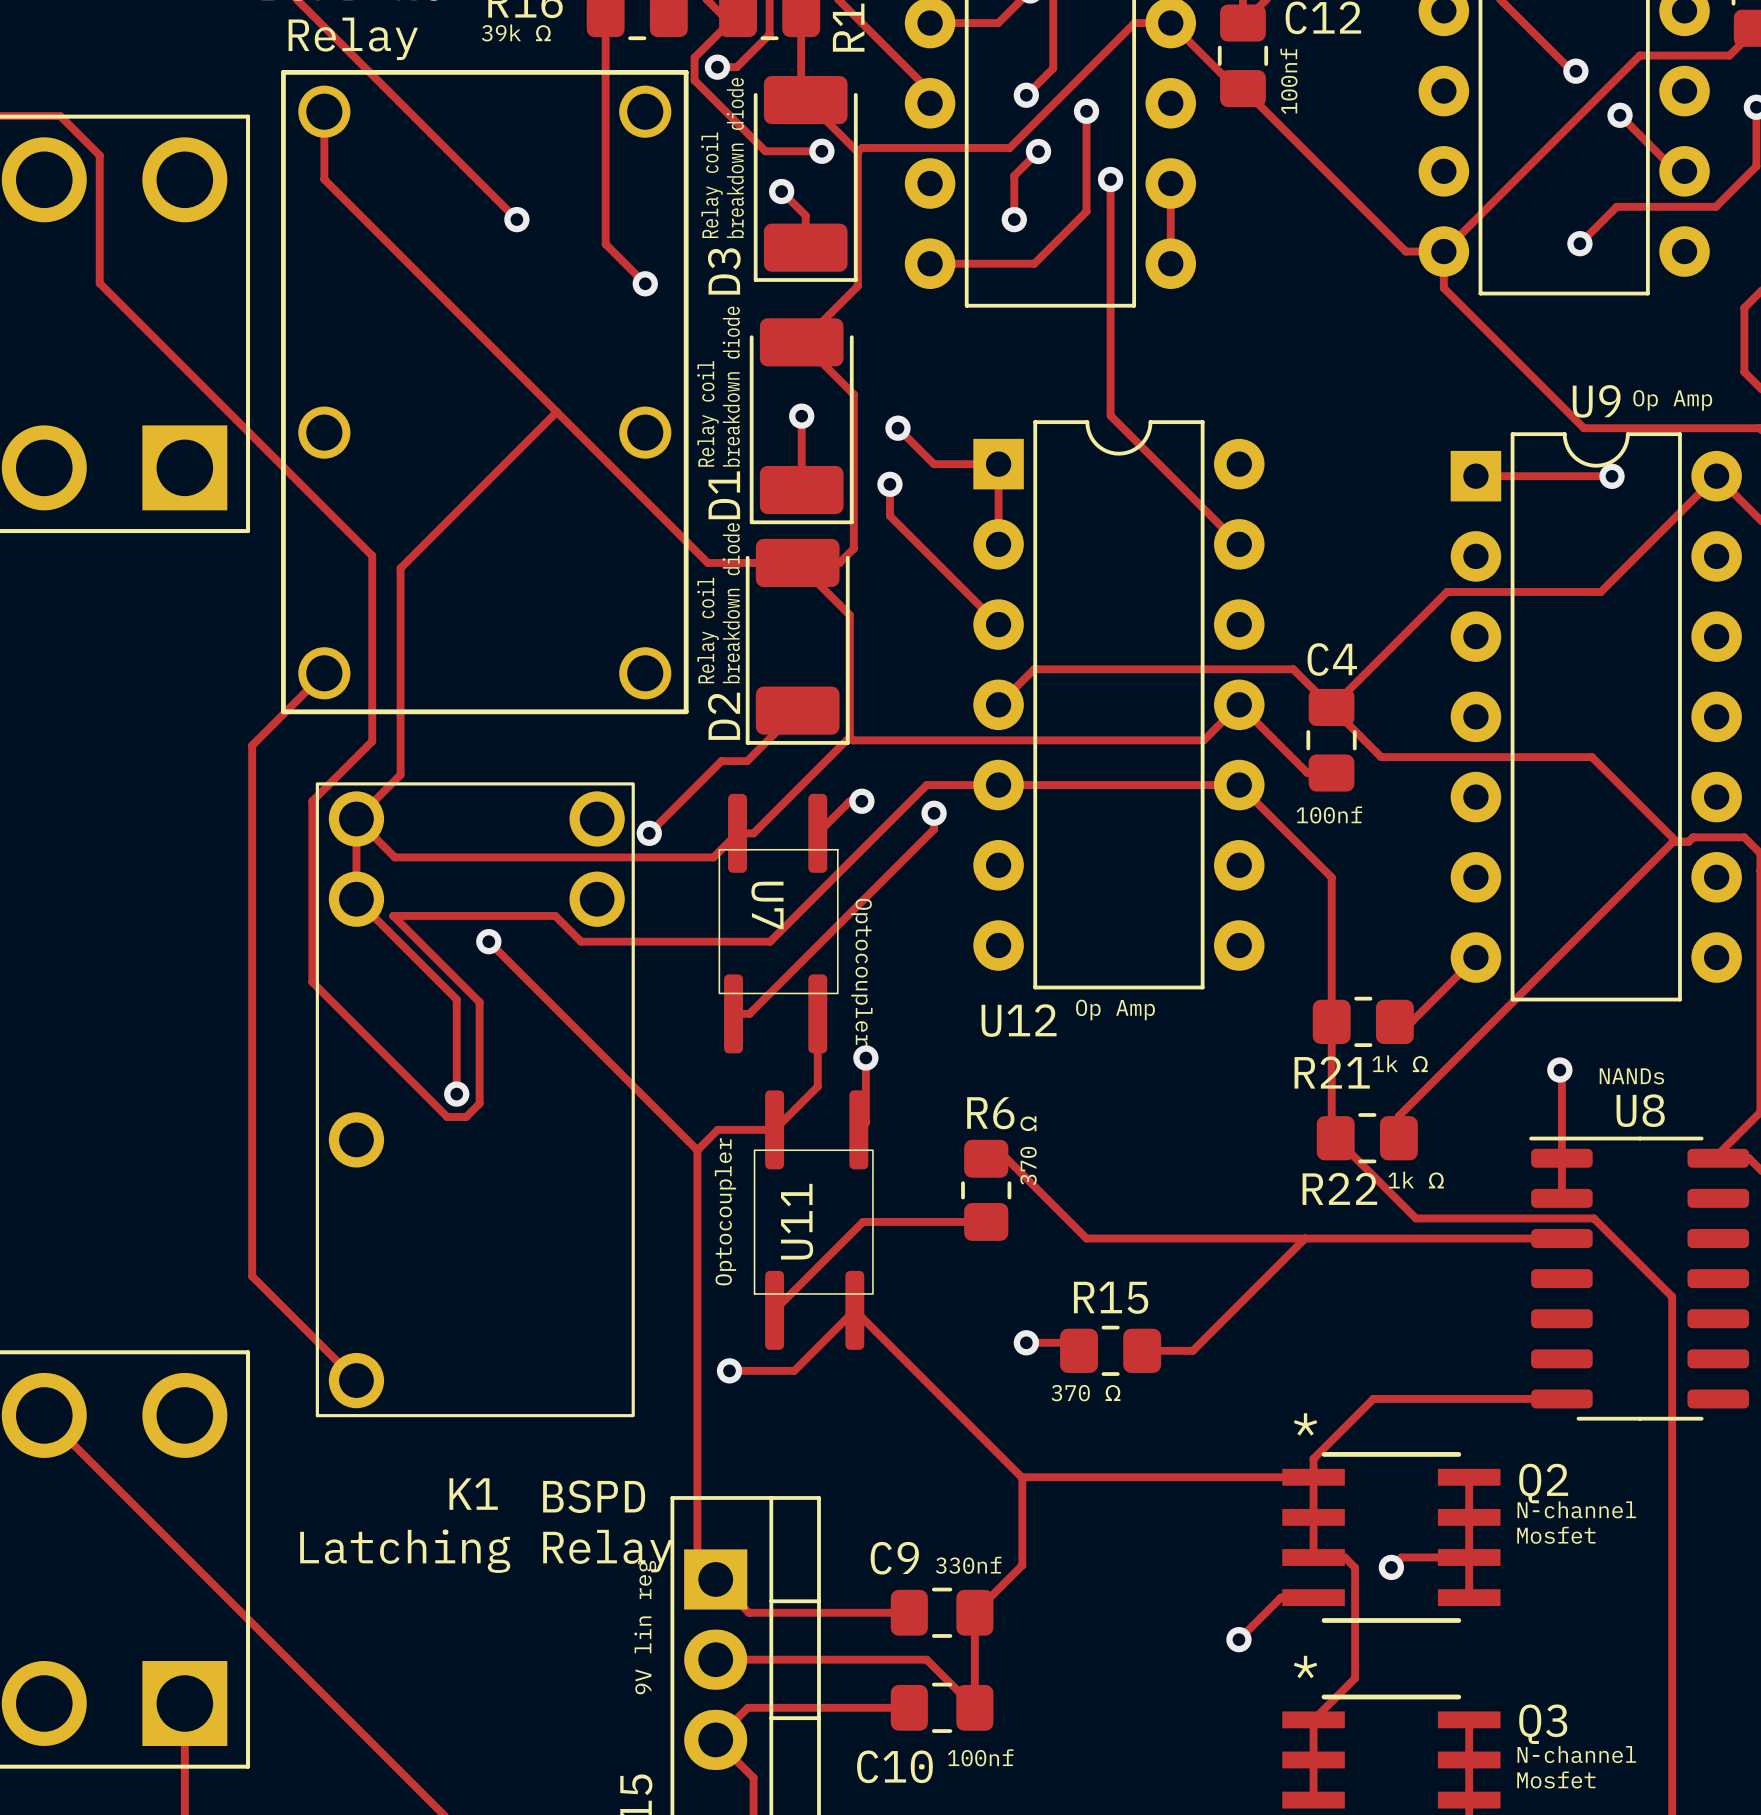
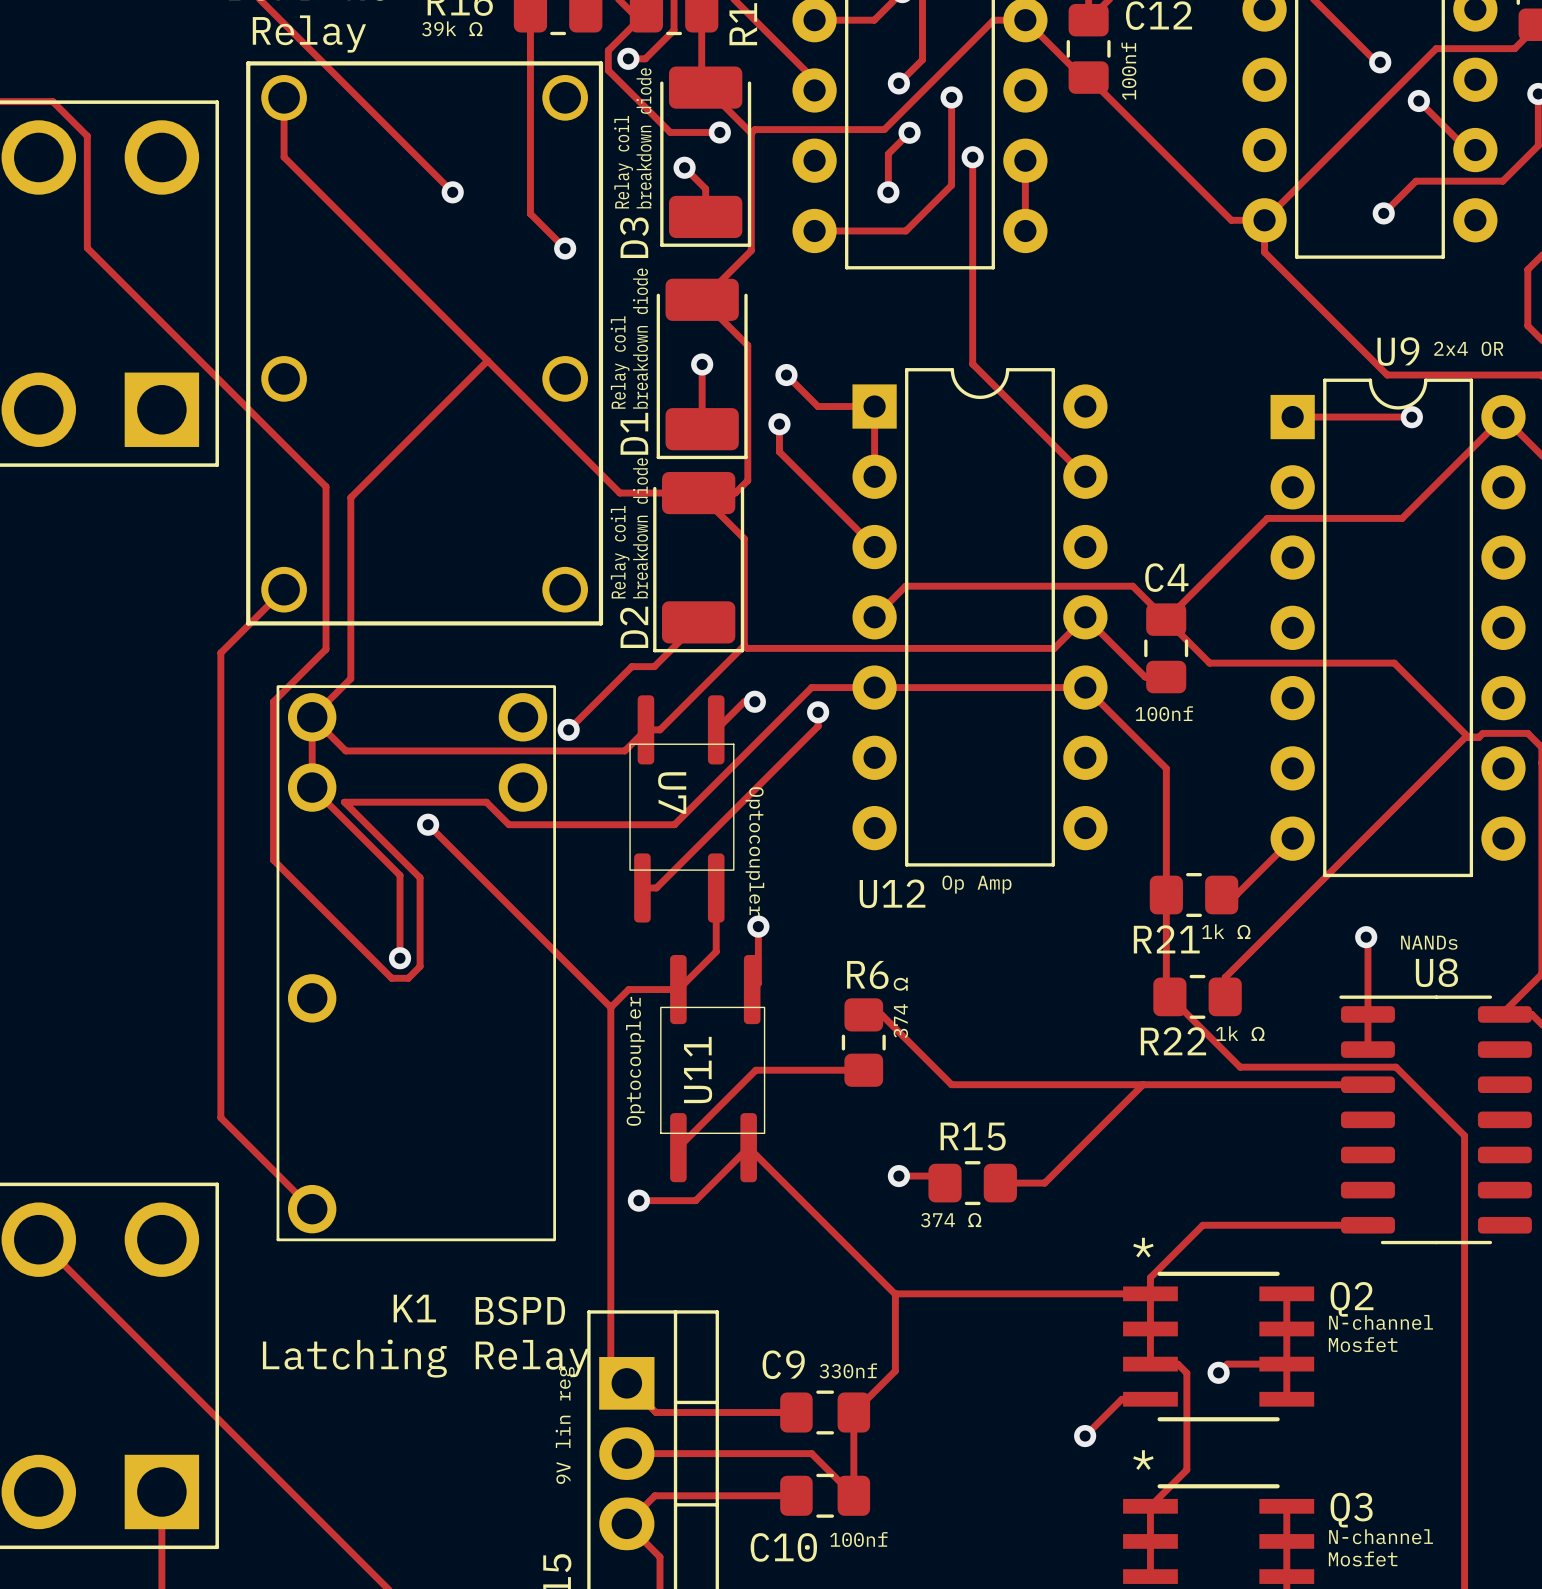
text: Op Amp (1672, 400) -> 2x4 OR (1468, 348)
text: 370 Ω (1028, 1150) -> 374 Ω (900, 1007)
text: 370 Ω (1085, 1393) -> 374 Ω (951, 1220)

